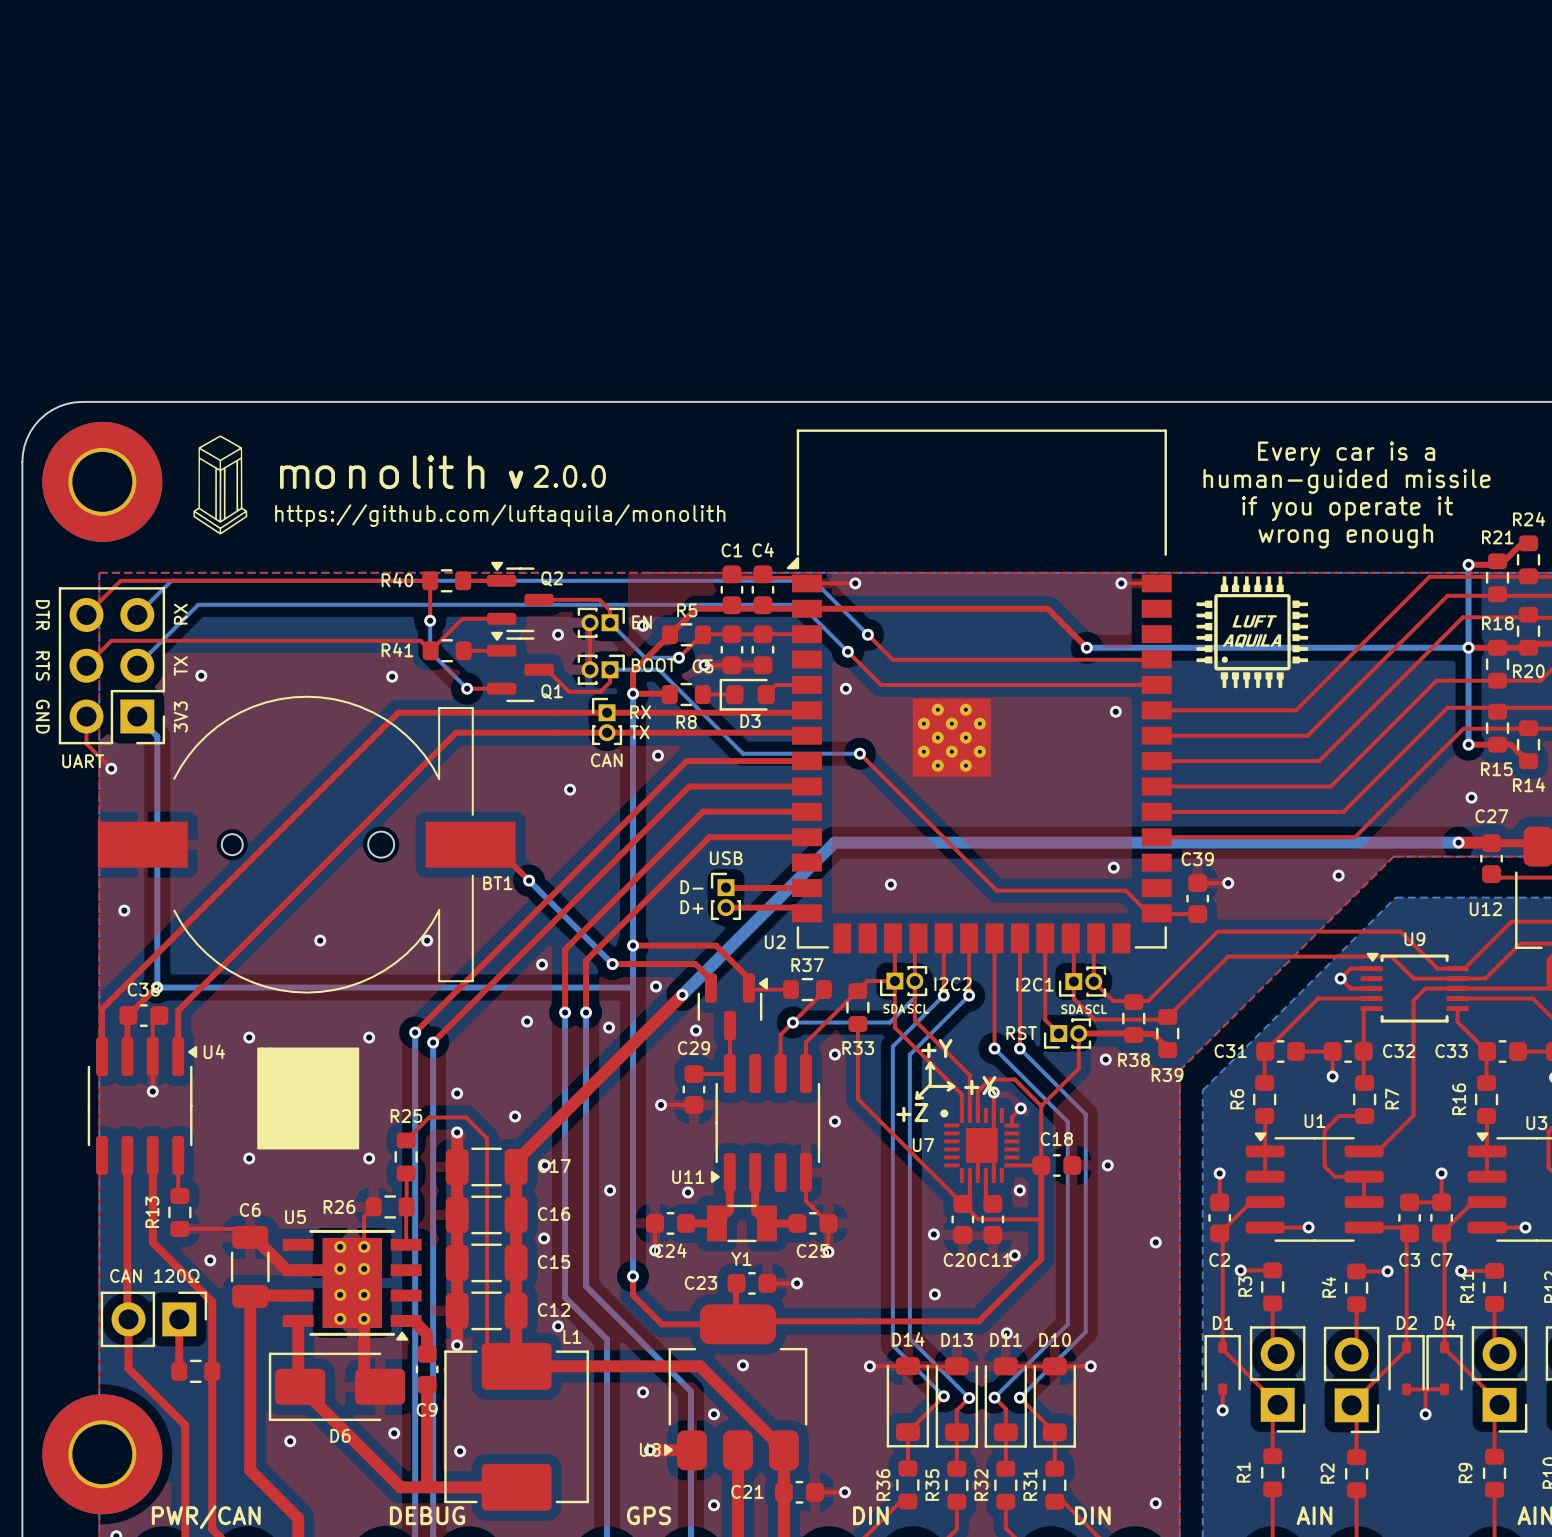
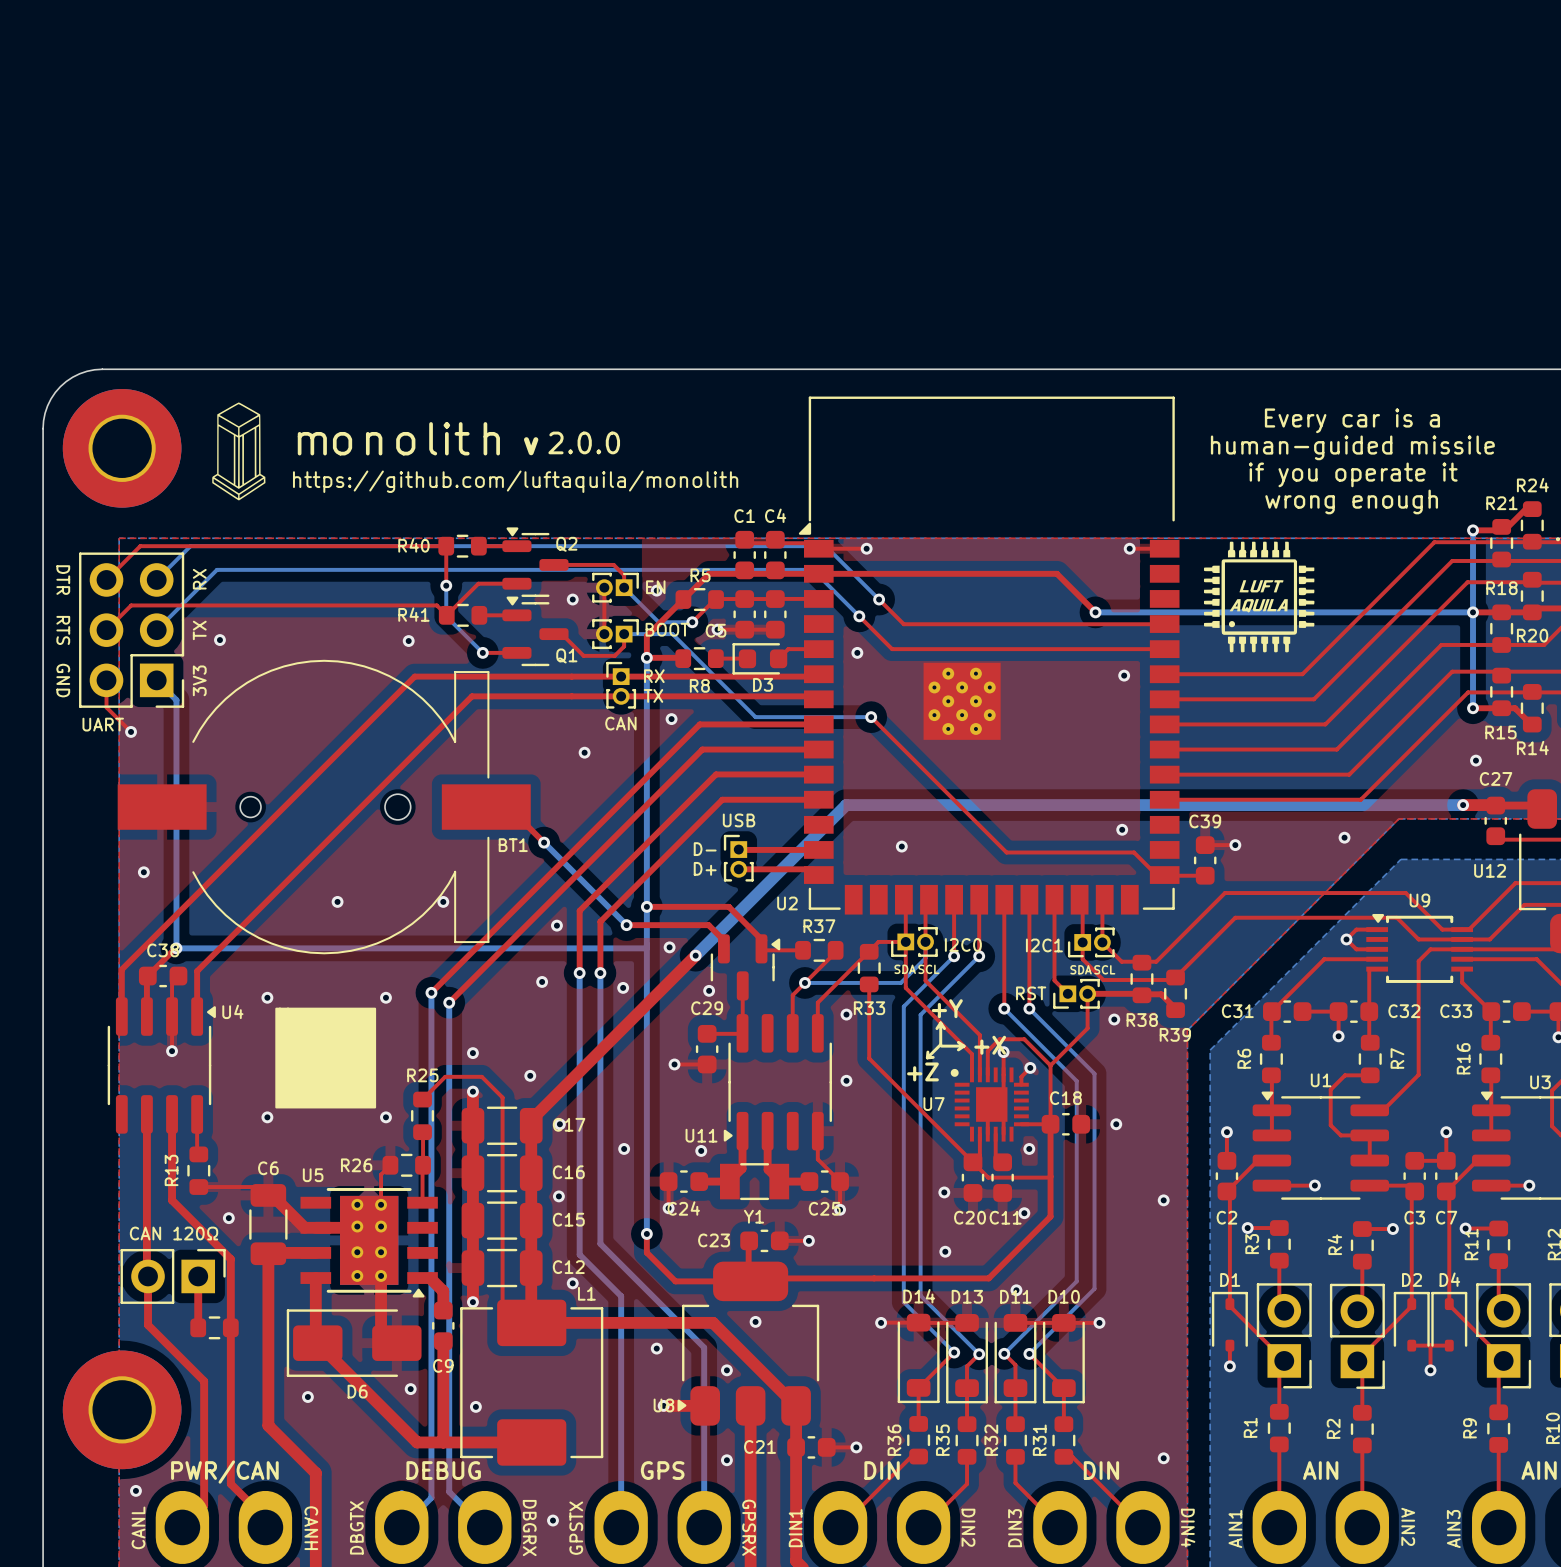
part value: I2C2 (953, 984) -> I2C0 (963, 944)

